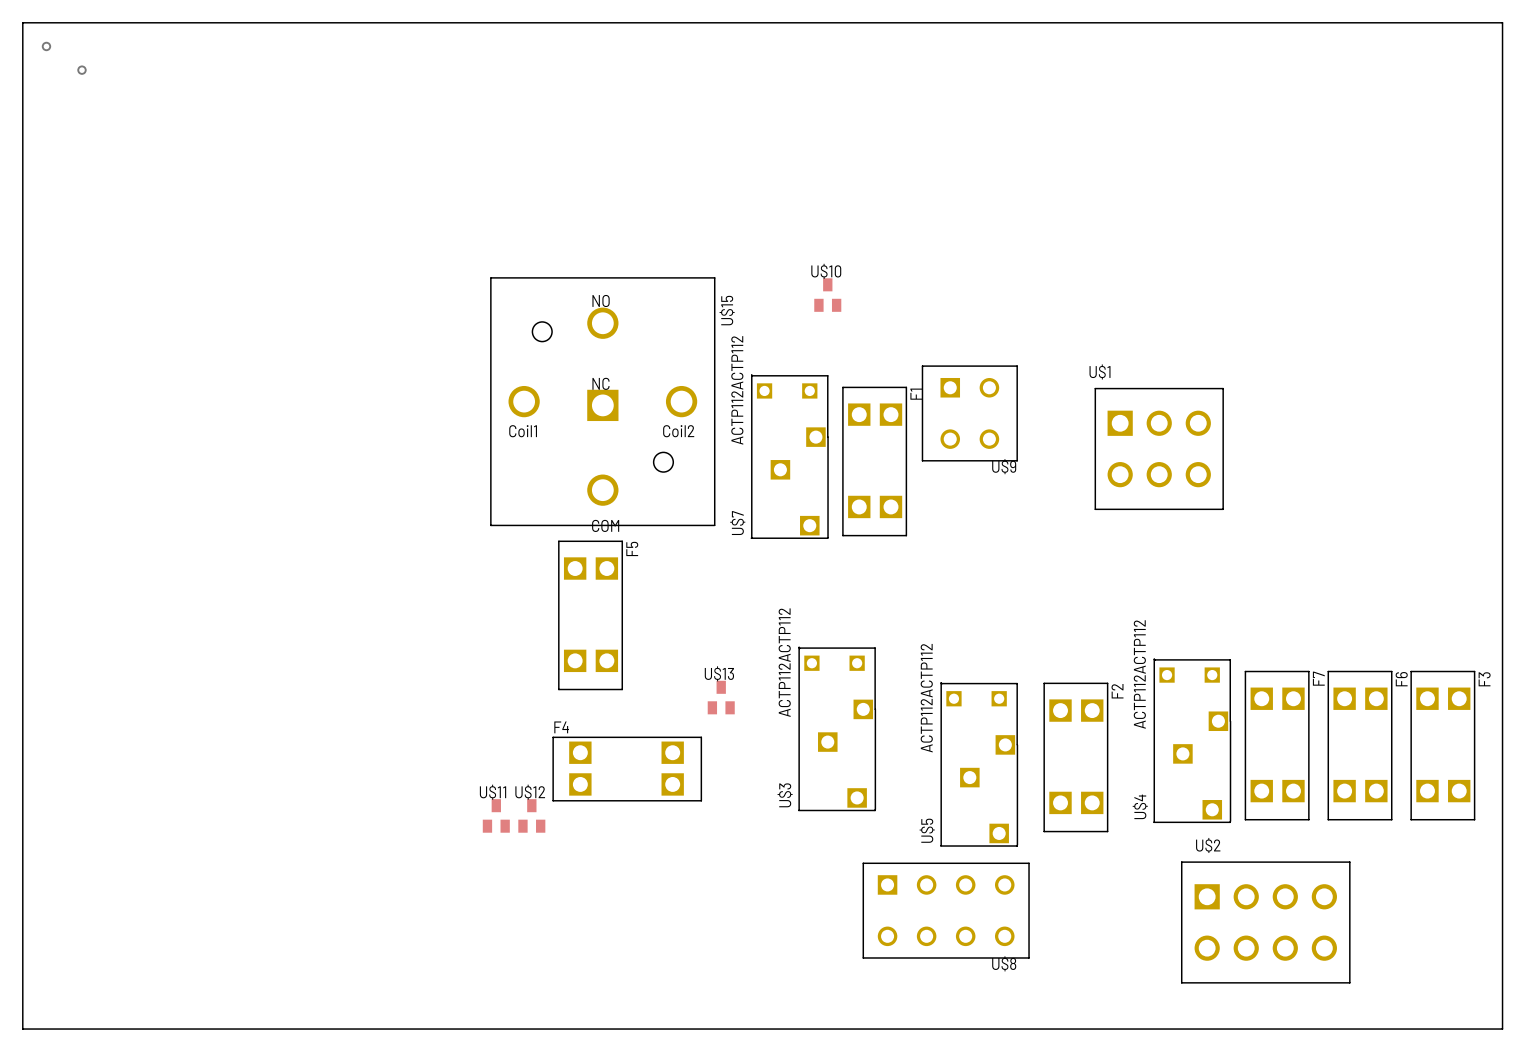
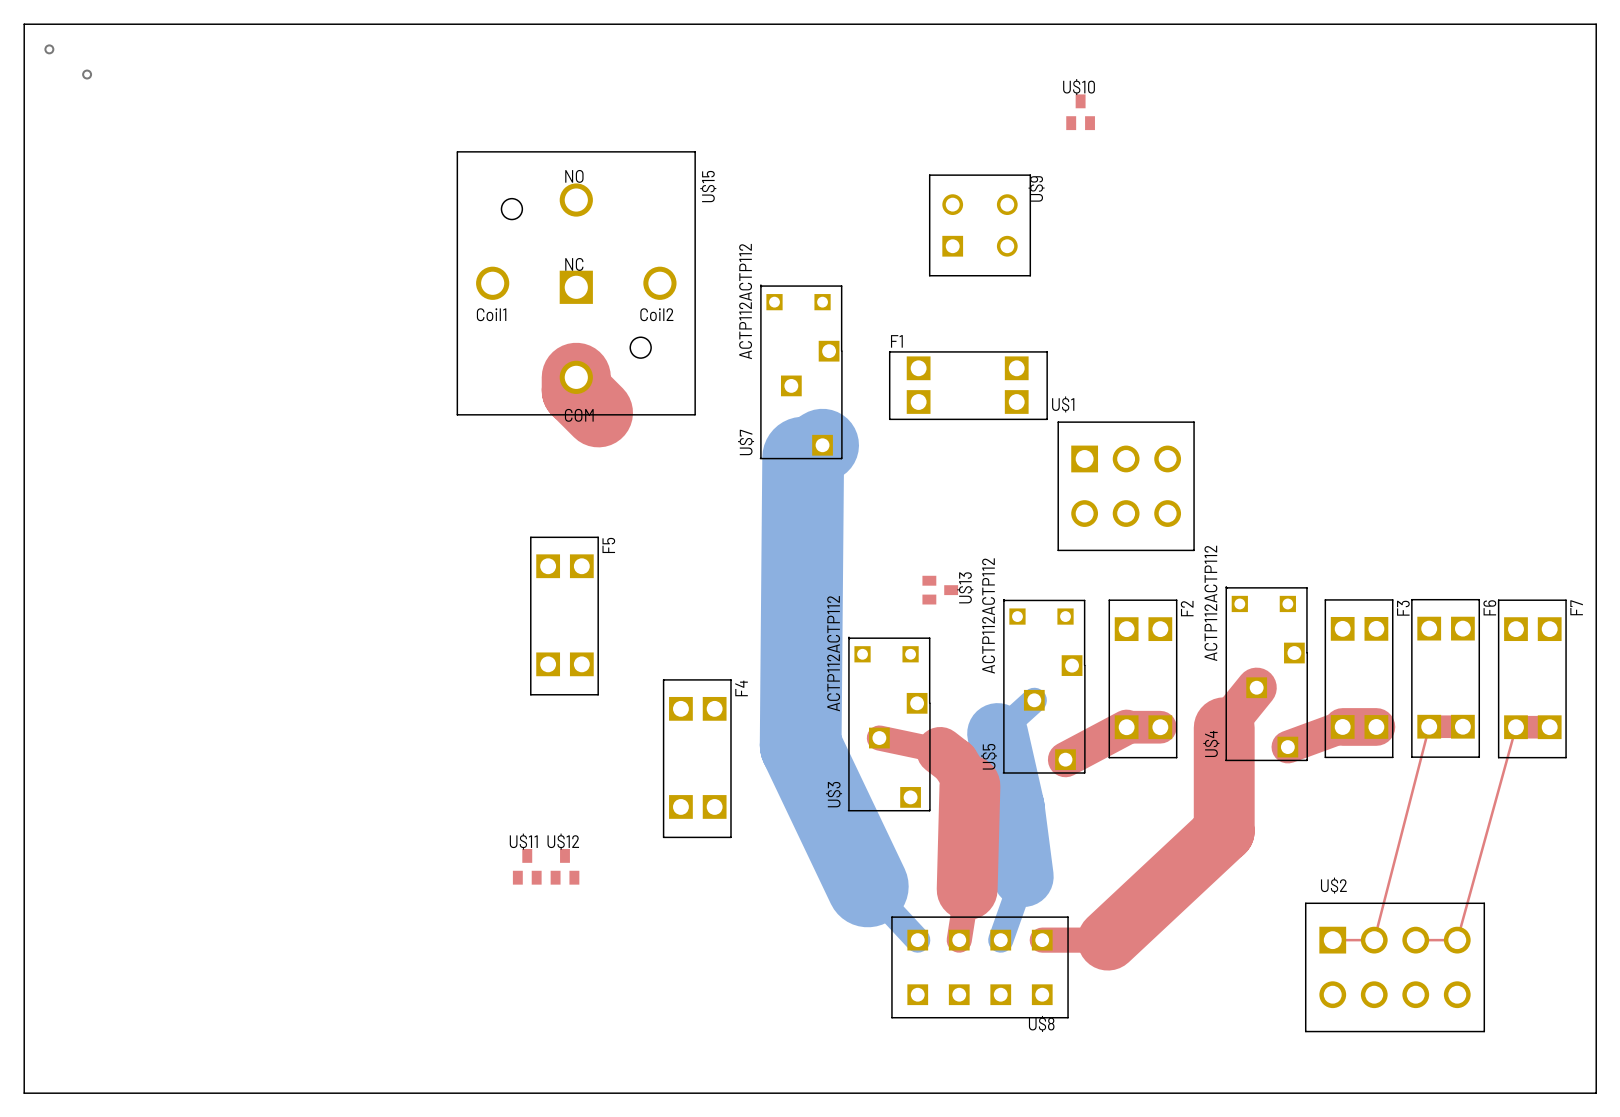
U$10 position: (827, 295) -> (1080, 112)
top track: none -> (576, 377) (576, 390) (598, 412)
U$15 position: (602, 401) -> (576, 283)
U$9 rotation: 0° (969, 413) -> 90° counterclockwise (980, 225)
U$9 position: (969, 413) -> (980, 225)
bottom track: none -> (822, 445) (803, 457) (800, 745) (867, 886) (917, 940)
U$1 position: (1159, 448) -> (1126, 486)
U$7 position: (789, 456) -> (801, 371)
F1 rotation: 0° (874, 461) -> 90° counterclockwise (968, 385)
F1 position: (874, 461) -> (968, 385)
F5 position: (590, 615) -> (564, 616)
top track: none -> (1256, 687) (1224, 727) (1224, 831) (1107, 940) (1042, 940)
bottom track: none -> (1034, 700) (997, 733) (1014, 806) (1023, 876) (1000, 940)
top track: none -> (1160, 727) (1126, 727) (1065, 759)
top track: none -> (1376, 726) (1342, 726) (1287, 747)
top track: none -> (1462, 726) (1429, 726) (1374, 940) (1332, 940)
top track: none -> (1549, 727) (1515, 727) (1457, 940) (1415, 940)
top track: none -> (879, 738) (940, 750) (954, 762) (969, 785) (967, 889) (959, 940)
U$13 rotation: 0° (721, 697) -> 90° clockwise (940, 590)
U$13 position: (721, 697) -> (940, 590)
U$3 position: (837, 728) -> (889, 724)
U$4 position: (1192, 740) -> (1266, 673)
F7 position: (1277, 745) -> (1532, 678)
F6 position: (1360, 745) -> (1445, 678)
F3 position: (1442, 745) -> (1359, 678)
F2 position: (1075, 757) -> (1142, 678)
U$5 position: (979, 764) -> (1044, 686)
F4 rotation: 0° (627, 769) -> 90° clockwise (697, 758)
U$8 footprint: [862, 862, 1030, 959] -> [891, 916, 1069, 1019]
U$2 position: (1265, 922) -> (1395, 967)

